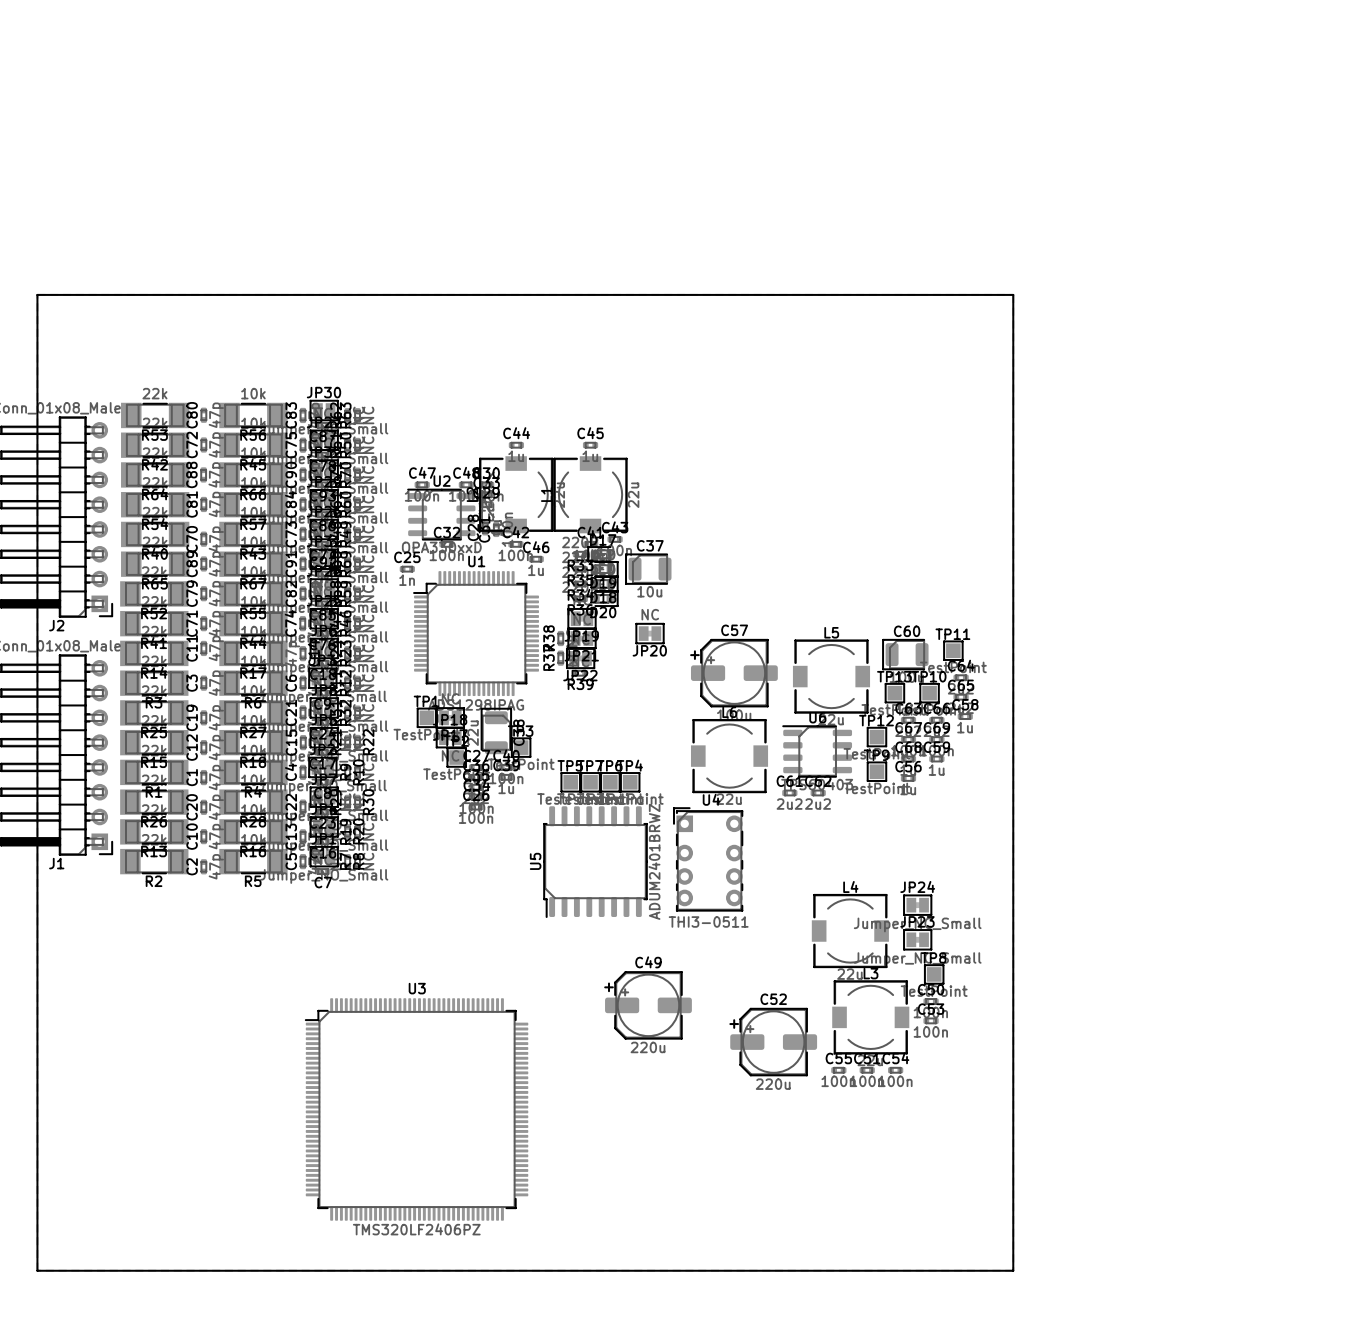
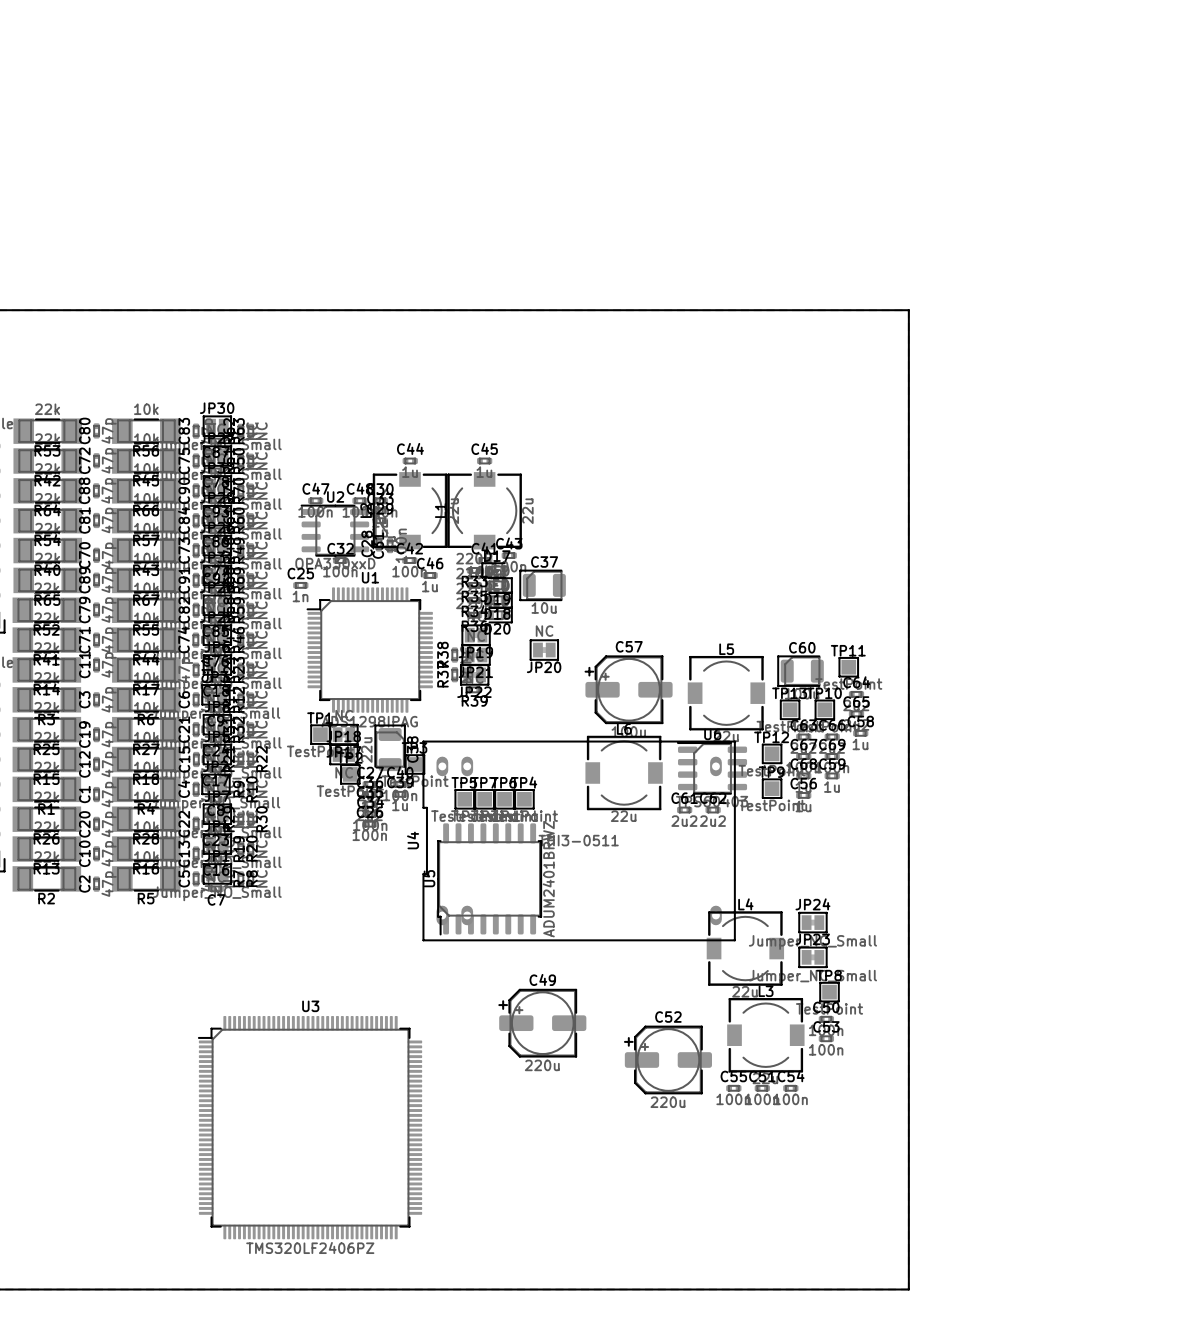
U4 name position: U4 (711, 799) -> U4 (413, 840)
U4 footprint: [673, 807, 743, 912] -> [422, 740, 736, 941]
U4 value position: THI3-0511 (708, 921) -> THI3-0511 (578, 840)

